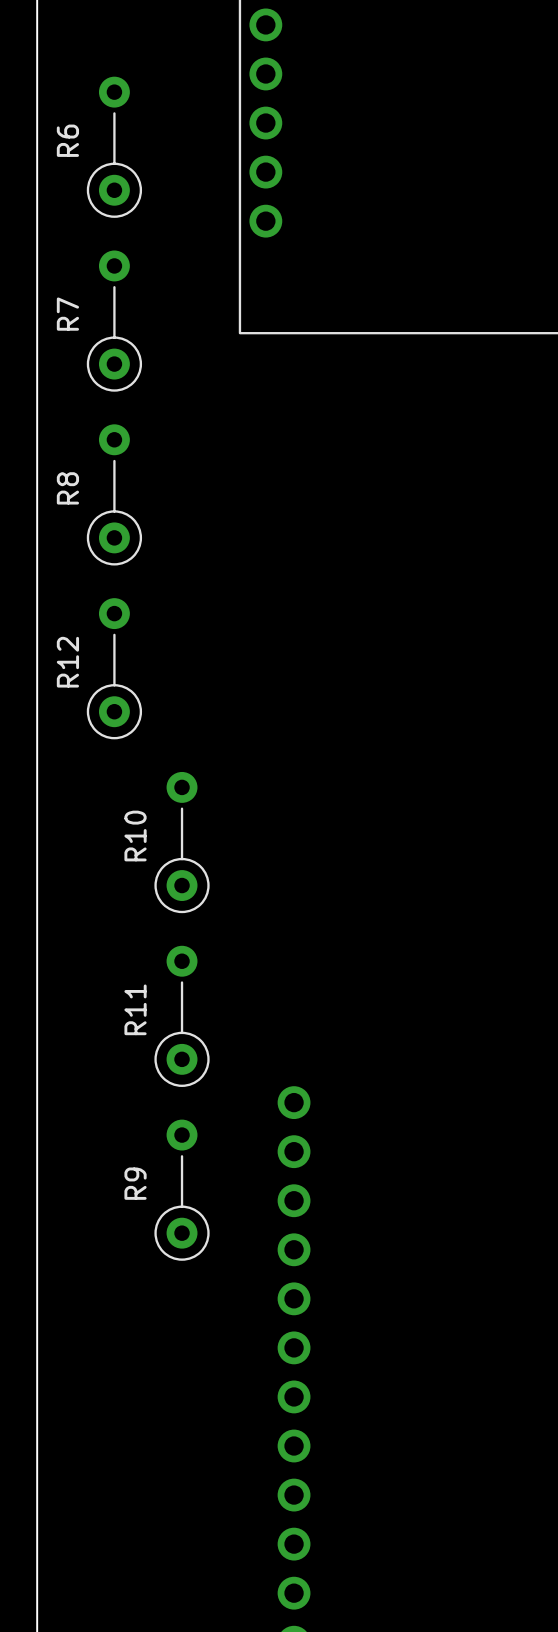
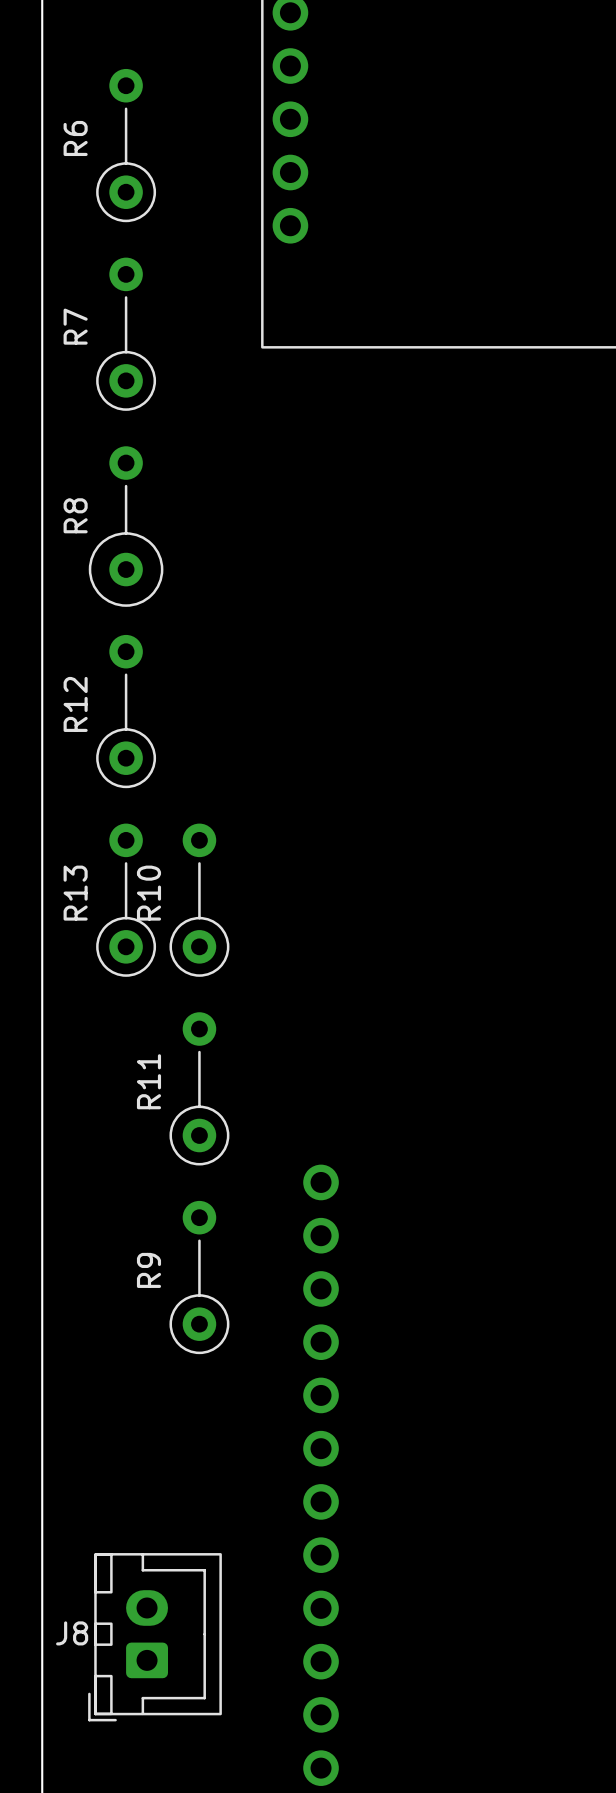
R8 footprint: [86, 424, 143, 566] -> [88, 446, 164, 607]
R13: none -> (126, 900)
J8: none -> (155, 1637)

